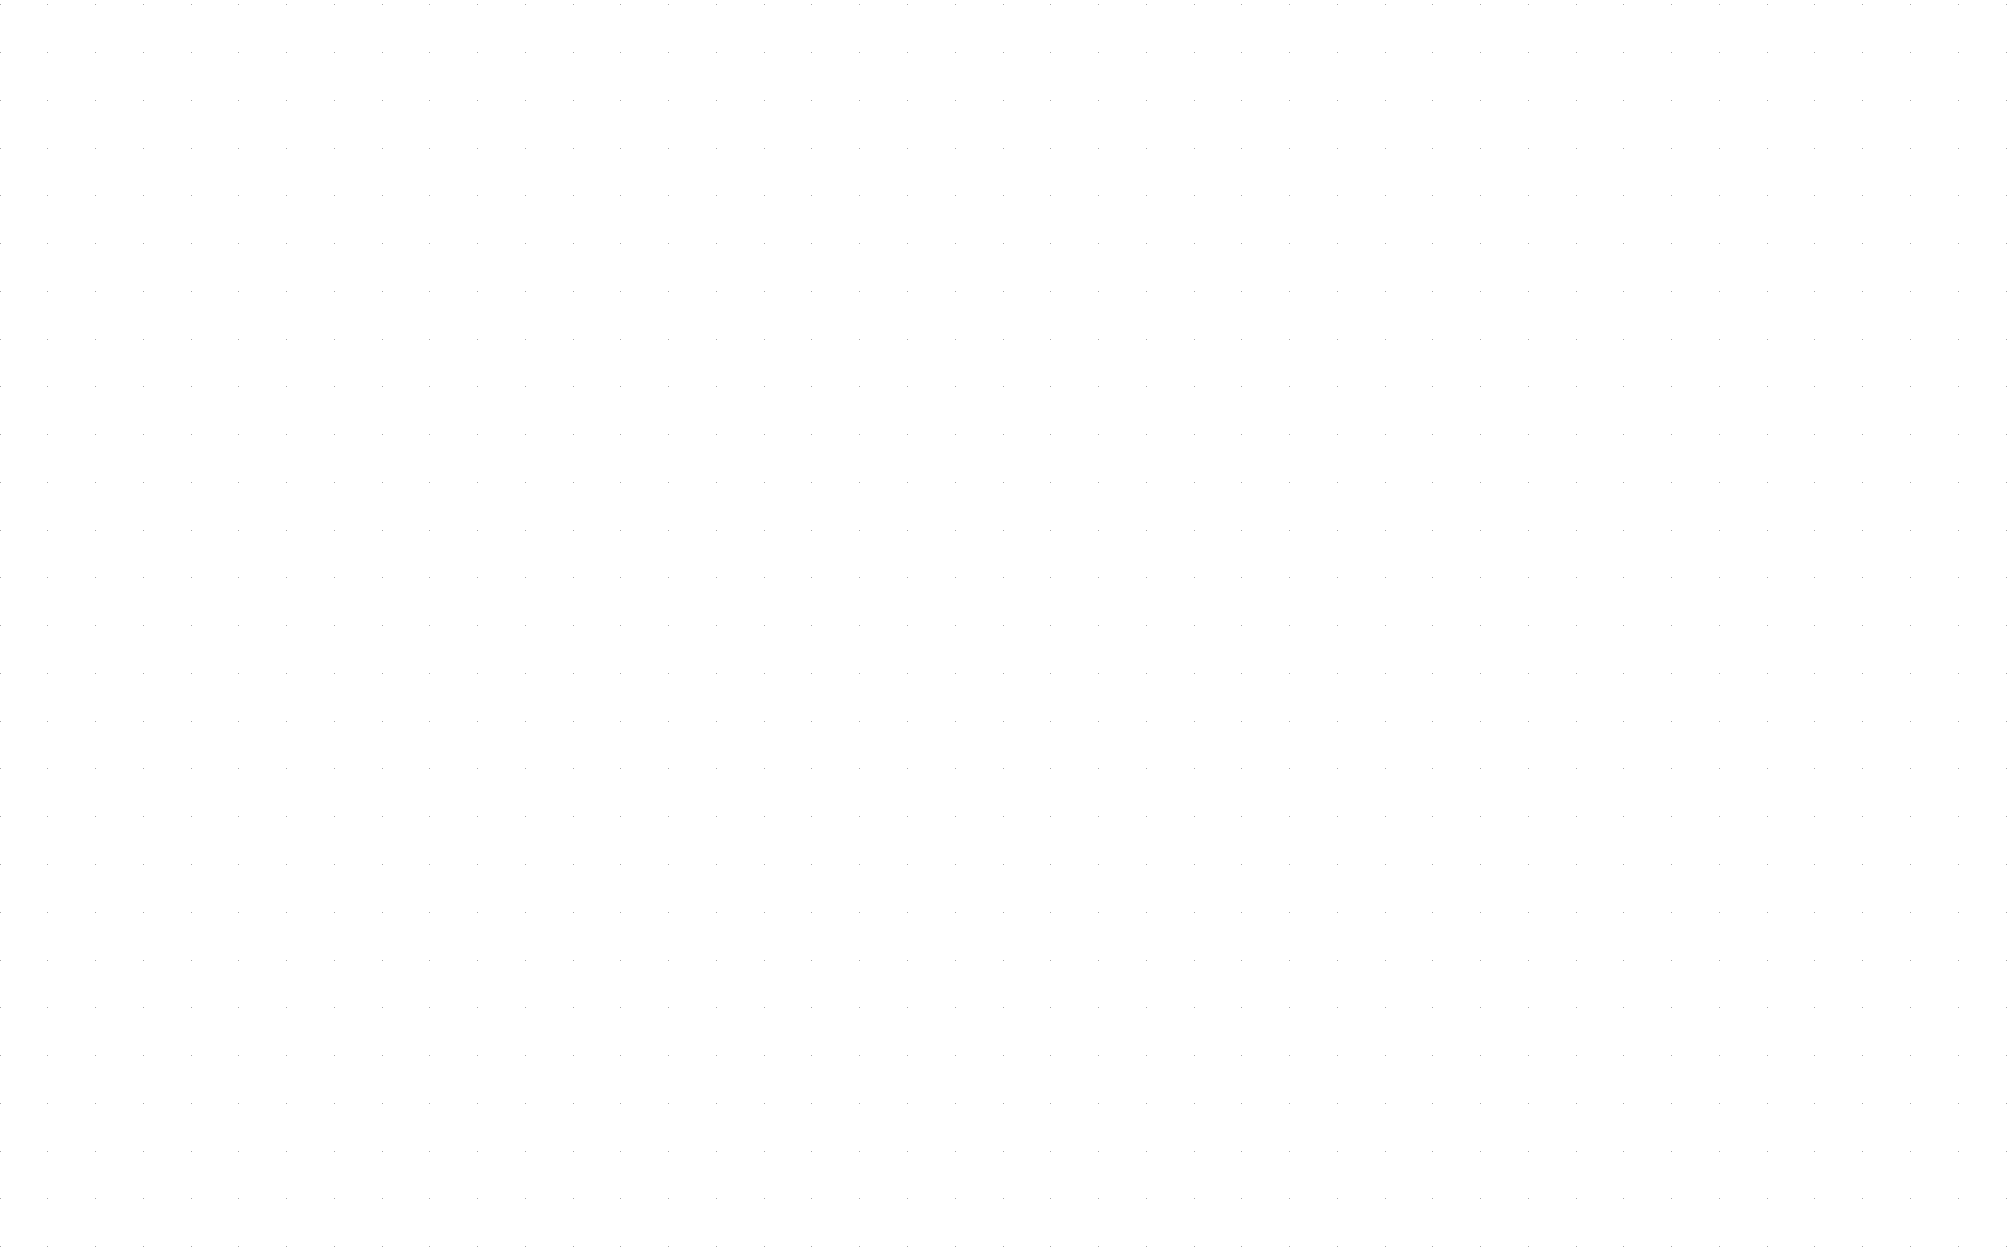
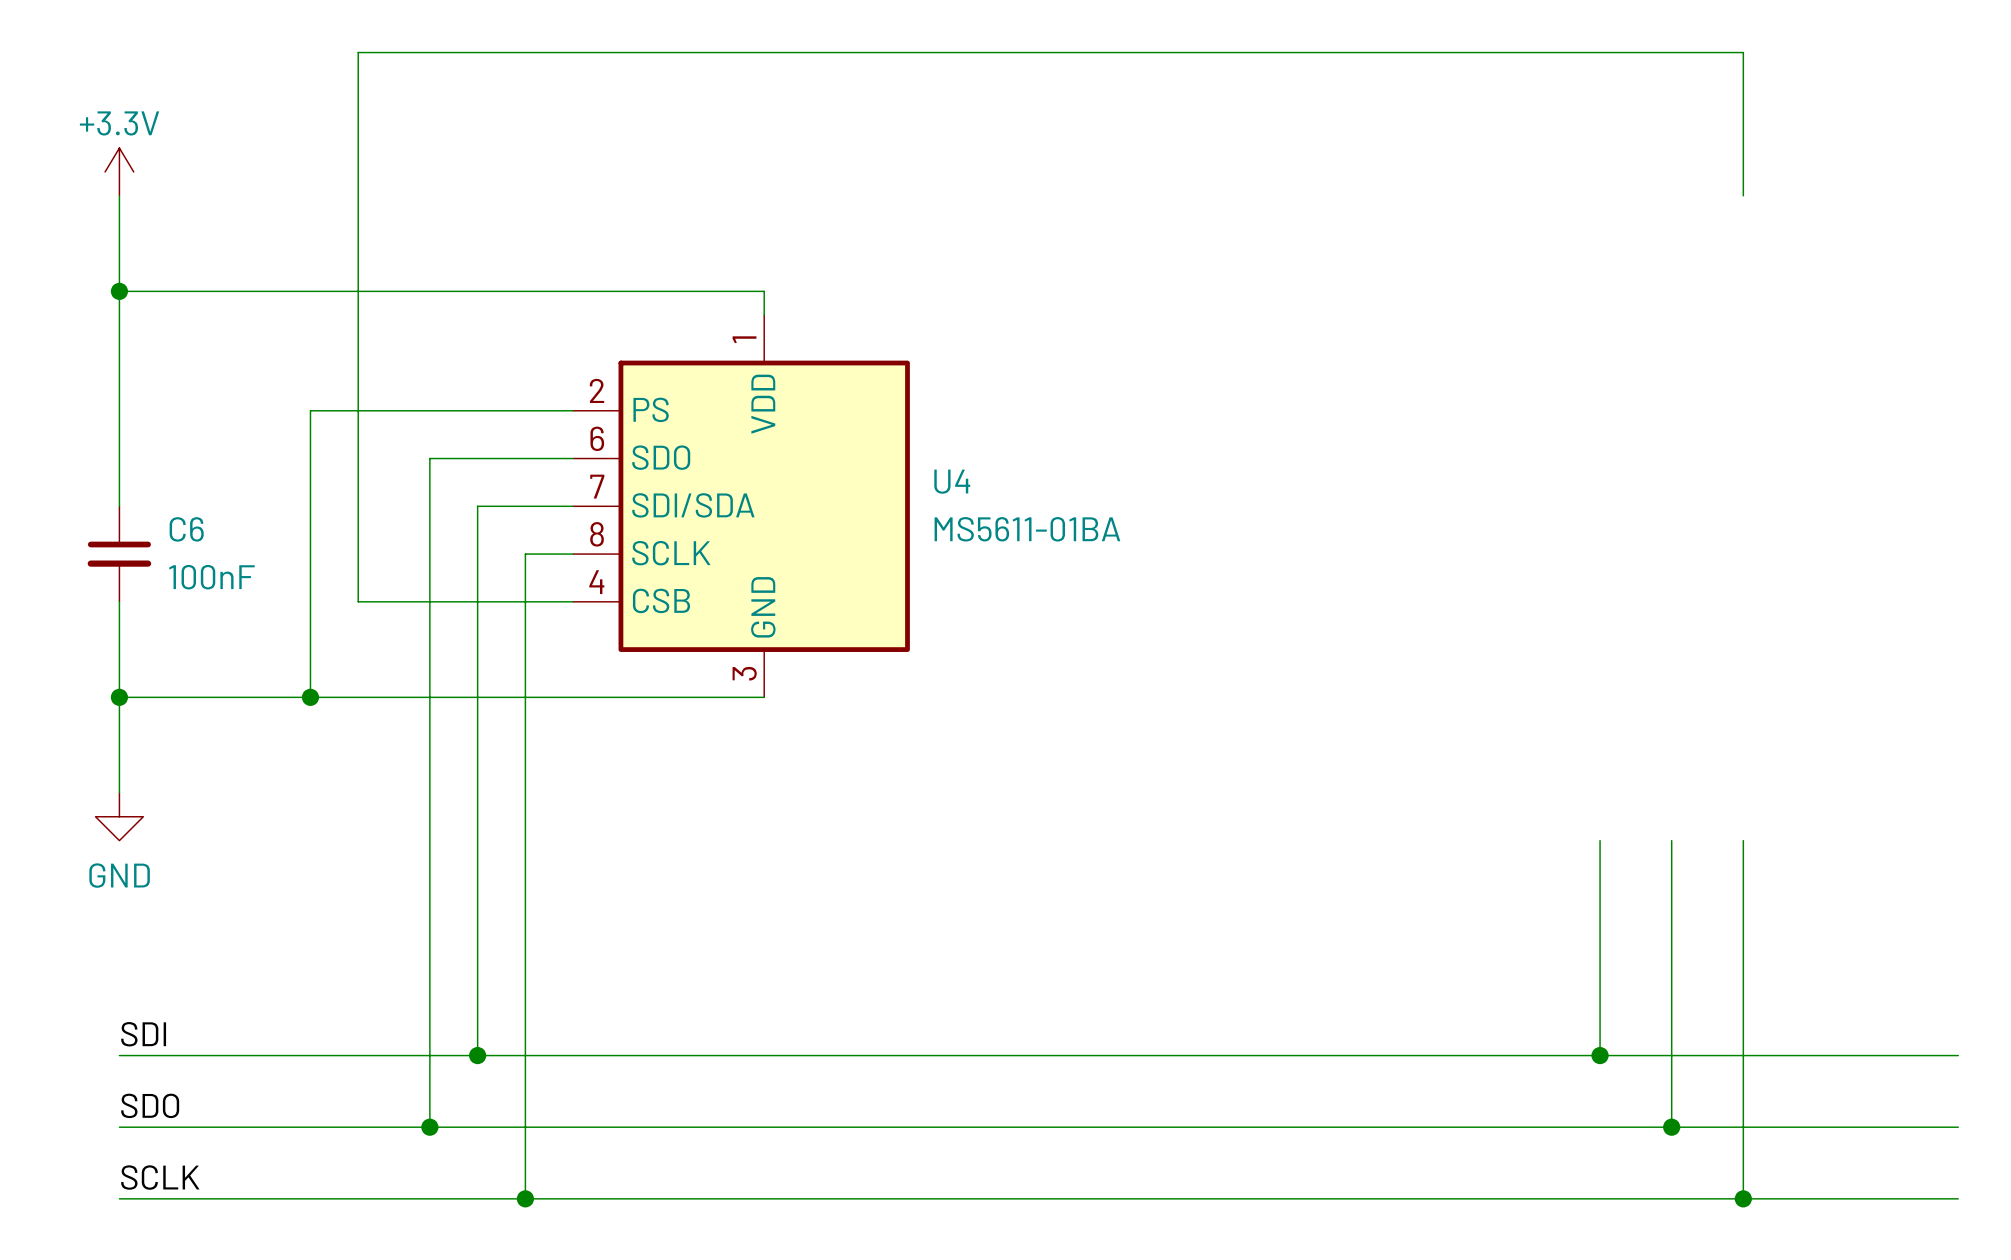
power symbol: none -> +3.3V (119, 171)
wire: none -> (119, 195) (119, 506)
wire: none -> (1743, 195) (1743, 52) (358, 52) (358, 601) (573, 601)
wire: none -> (119, 291) (764, 291) (764, 315)
junction: none -> (119, 291)
wire: none -> (573, 410) (310, 410) (310, 697)
wire: none -> (573, 458) (429, 458) (429, 1127)
wire: none -> (573, 506) (477, 506) (477, 1055)
U4: none -> MS5611-01BA (741, 506)
C6: none -> 100nF (119, 554)
wire: none -> (573, 554) (525, 554) (525, 1198)
wire: none -> (119, 601) (119, 792)
wire: none -> (119, 697) (764, 697)
junction: none -> (119, 697)
junction: none -> (310, 697)
power symbol: none -> GND (119, 816)
wire: none -> (1600, 840) (1600, 1055)
wire: none -> (1671, 840) (1671, 1127)
wire: none -> (1743, 840) (1743, 1198)
label: none -> SDI (143, 1034)
wire: none -> (119, 1055) (1958, 1055)
junction: none -> (477, 1055)
junction: none -> (1600, 1055)
label: none -> SDO (150, 1105)
wire: none -> (119, 1127) (1958, 1127)
junction: none -> (429, 1127)
junction: none -> (1671, 1127)
label: none -> SCLK (160, 1177)
wire: none -> (119, 1198) (1958, 1198)
junction: none -> (525, 1198)
junction: none -> (1743, 1198)

